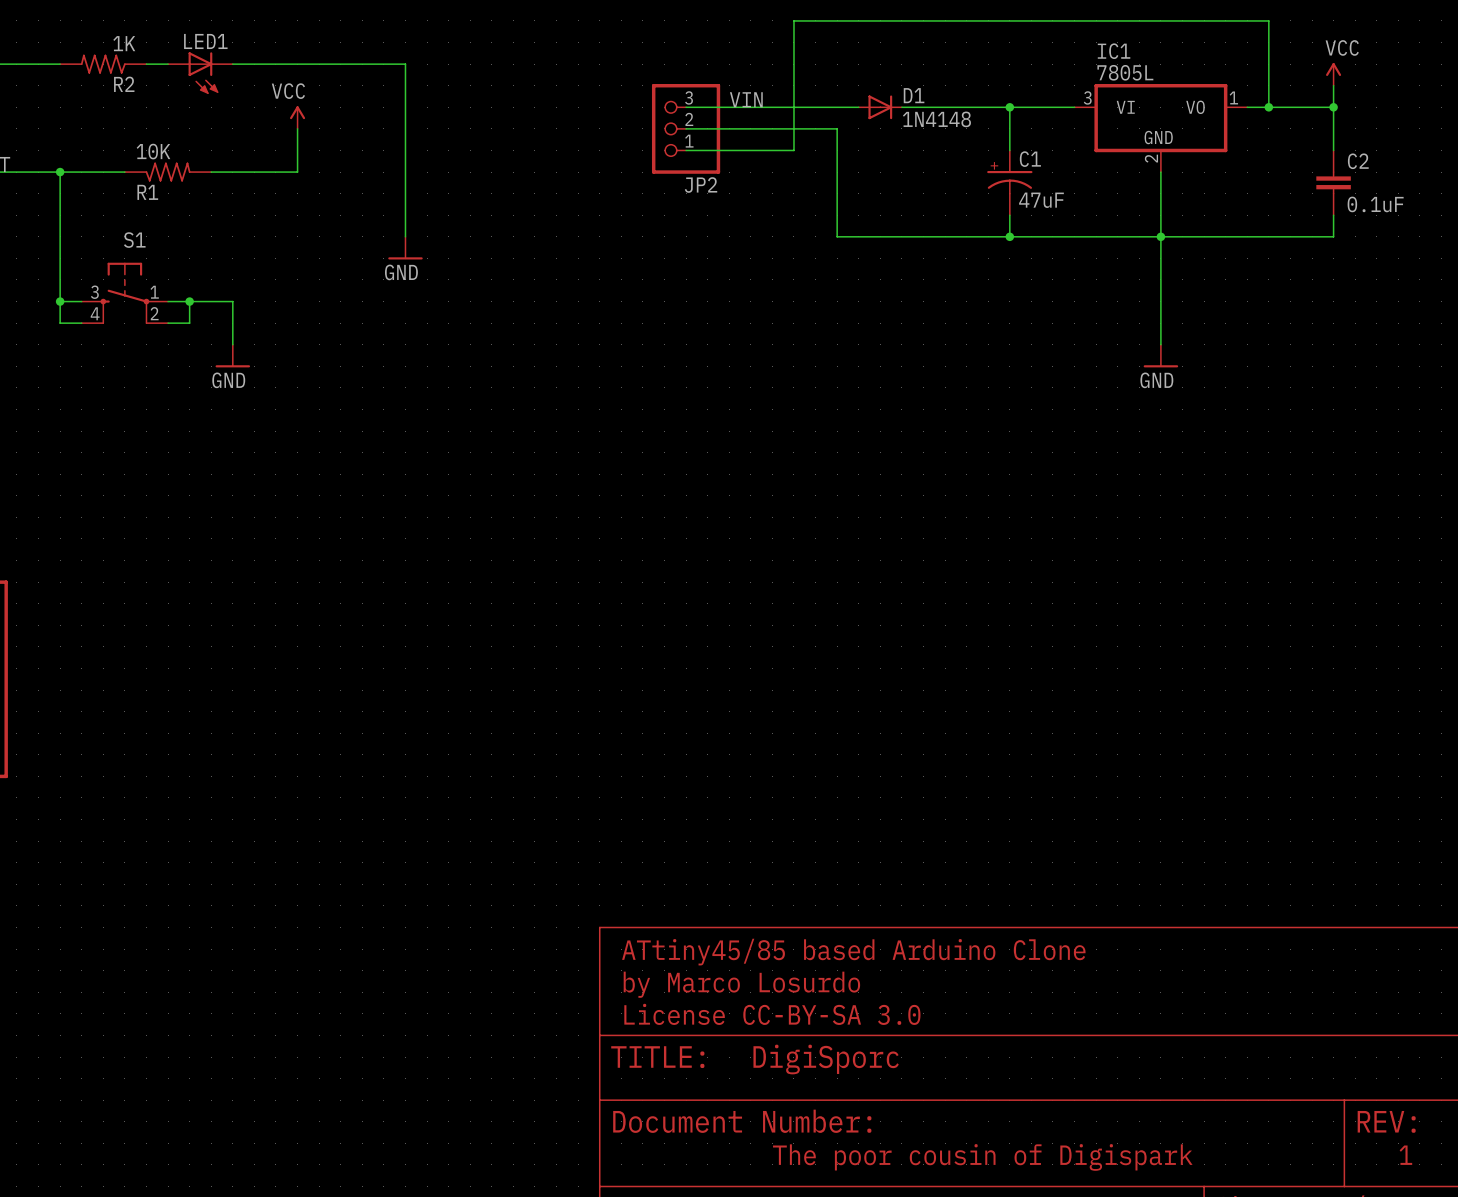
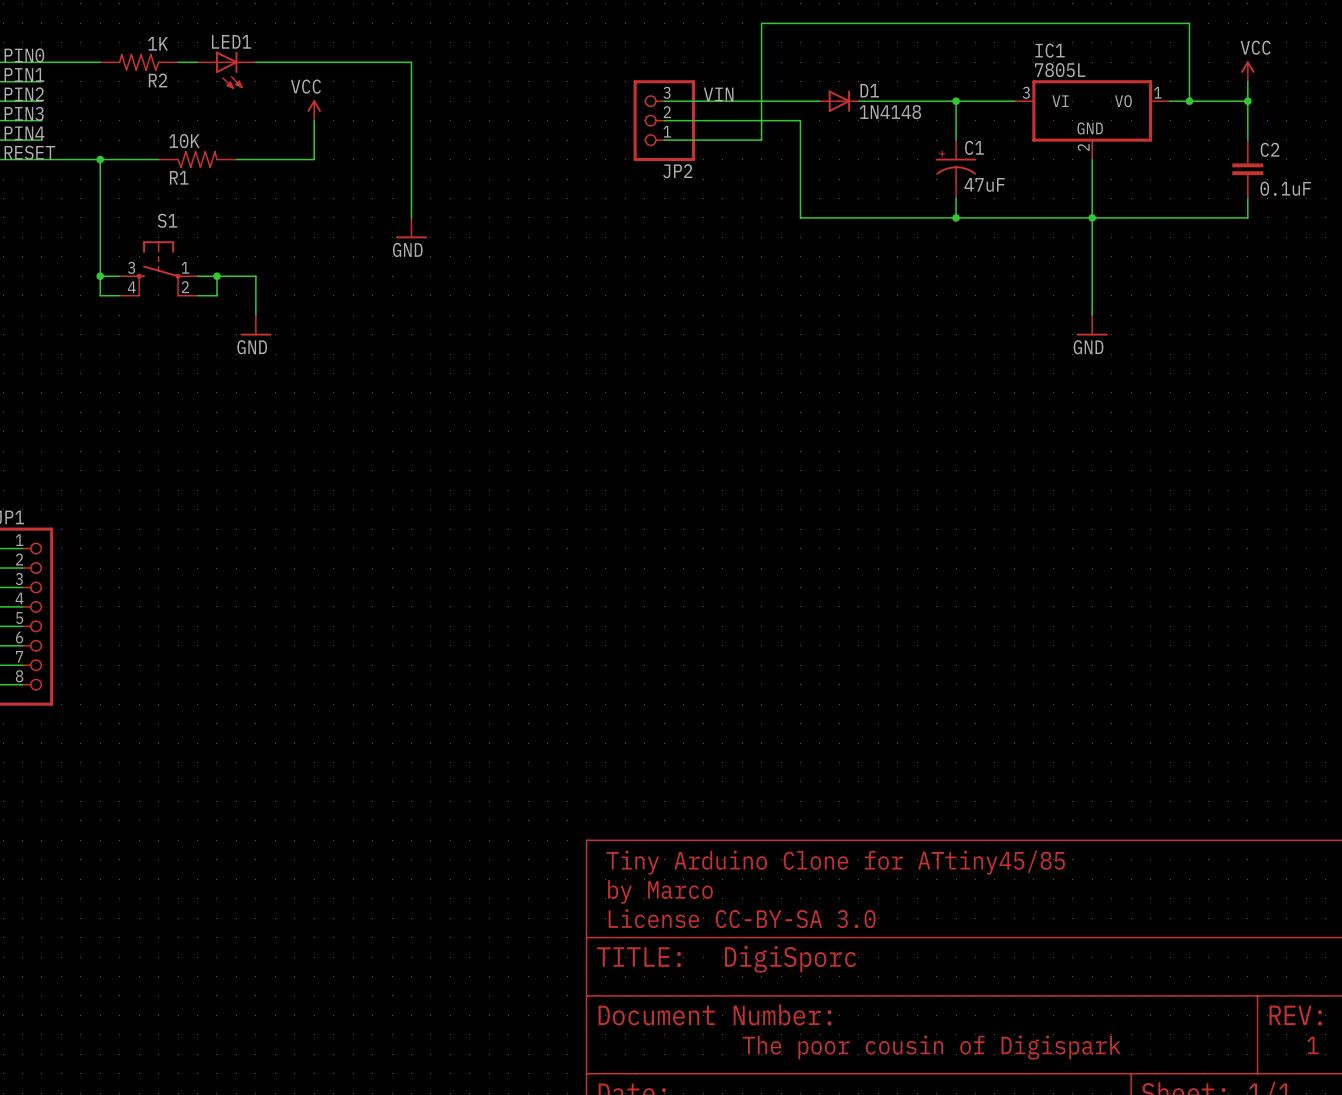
text: ATtiny45/85 based Arduino Clone (853, 952) -> Tiny Arduino Clone for ATtiny45/85 (835, 862)
text: by Marco Losurdo (741, 984) -> by Marco (660, 891)

